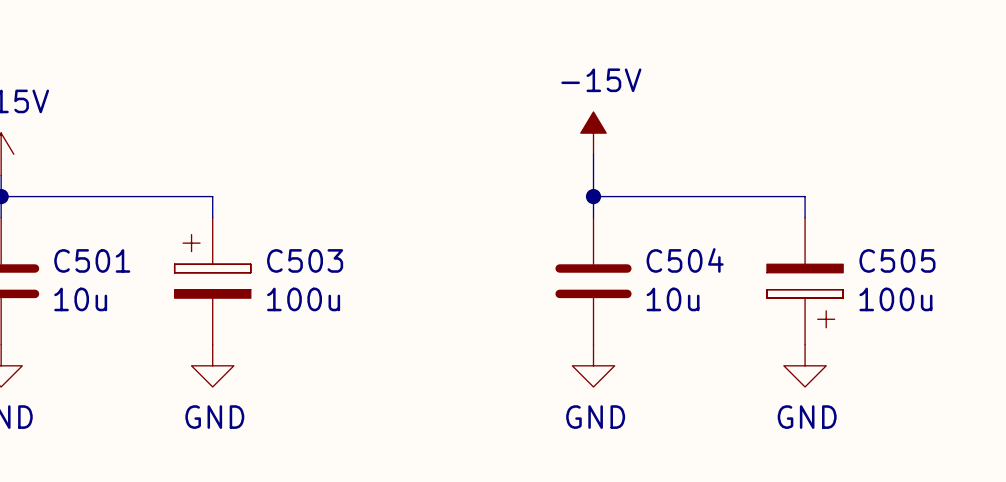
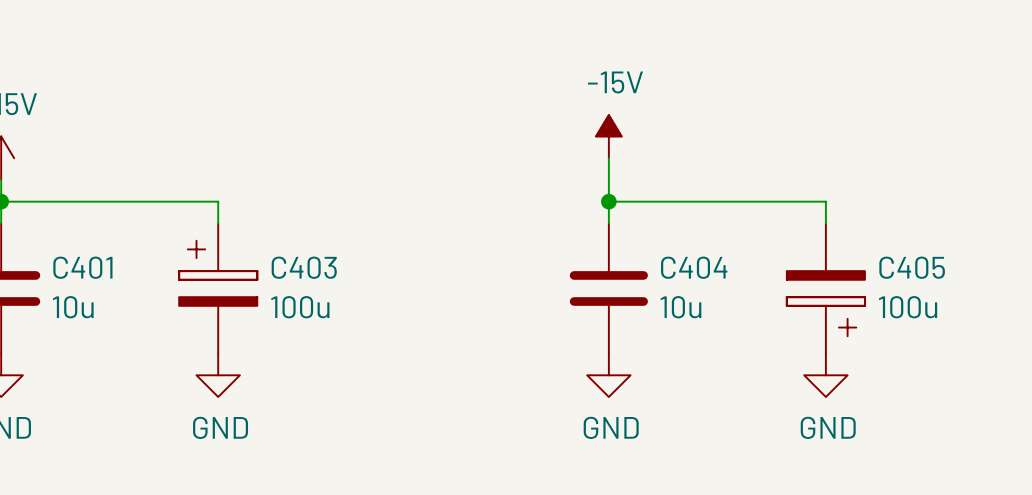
C501 name: C501 (92, 260) -> C401 (82, 267)
C503 name: C503 (305, 260) -> C403 (304, 267)
C504 name: C504 (685, 260) -> C404 (694, 267)
C505 name: C505 (897, 260) -> C405 (912, 267)

